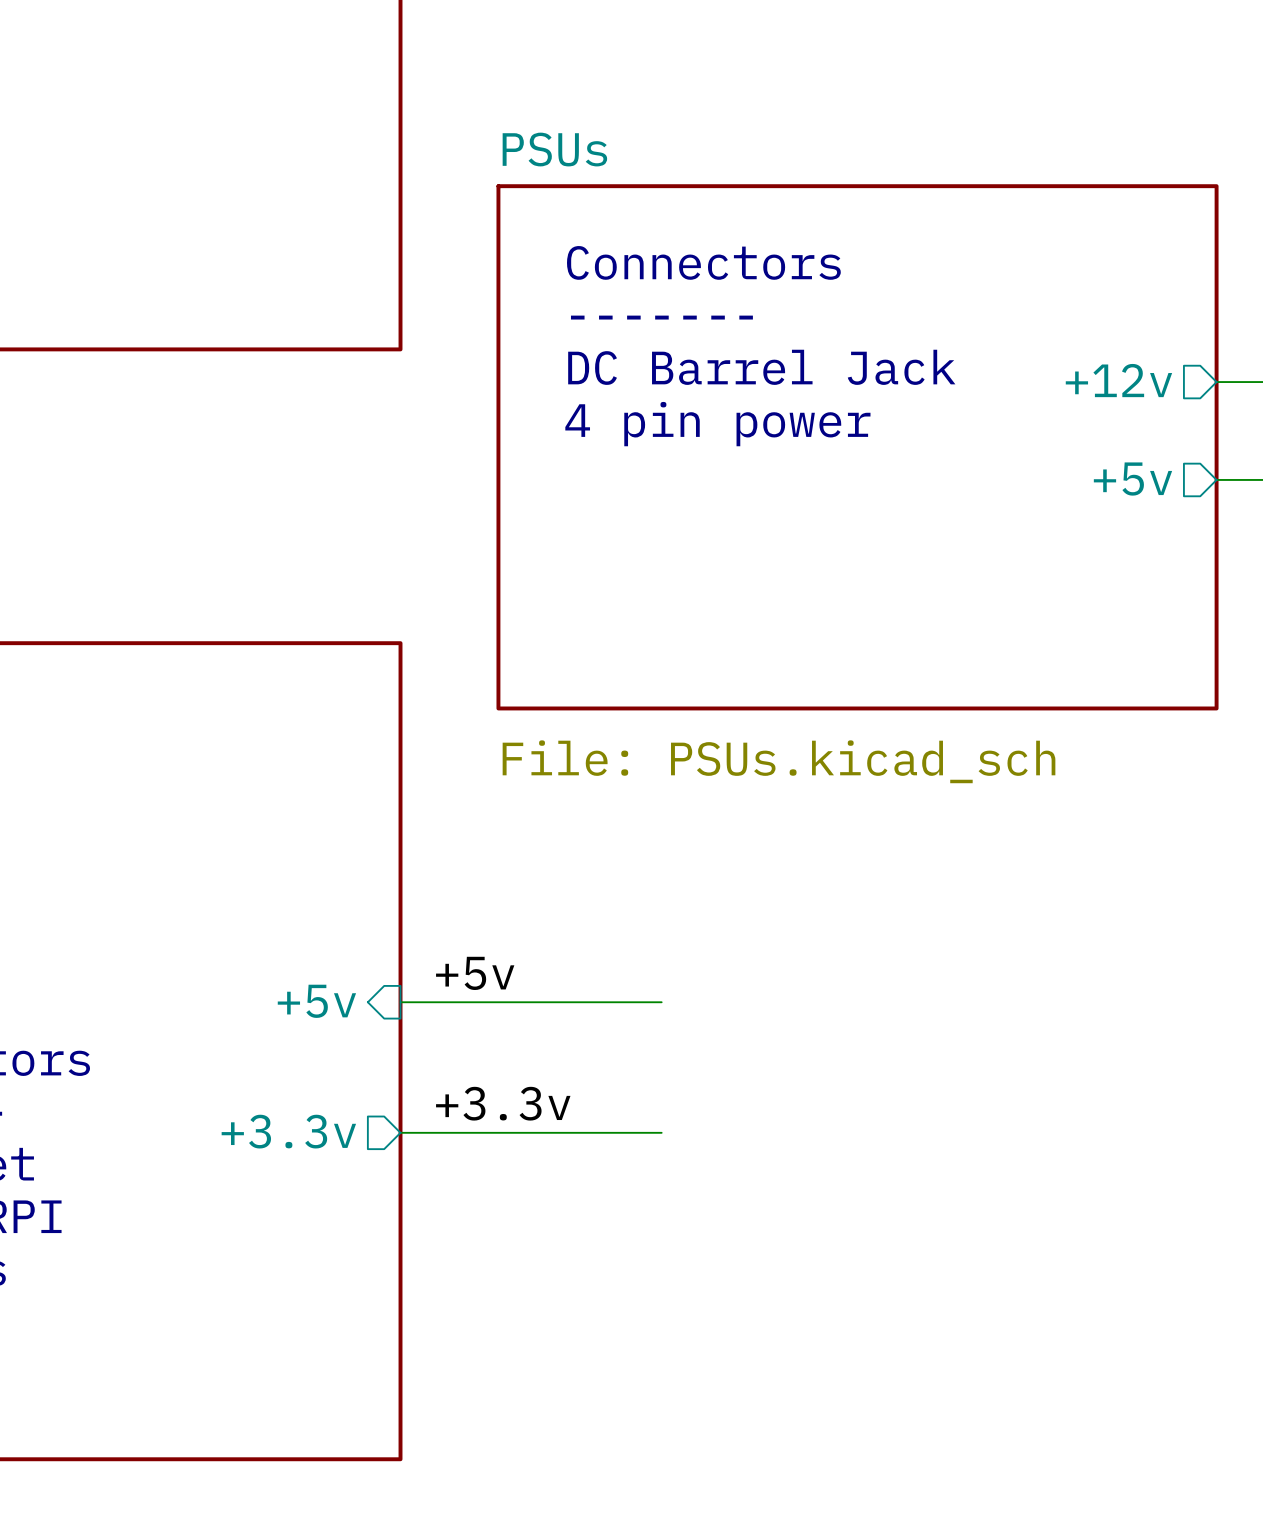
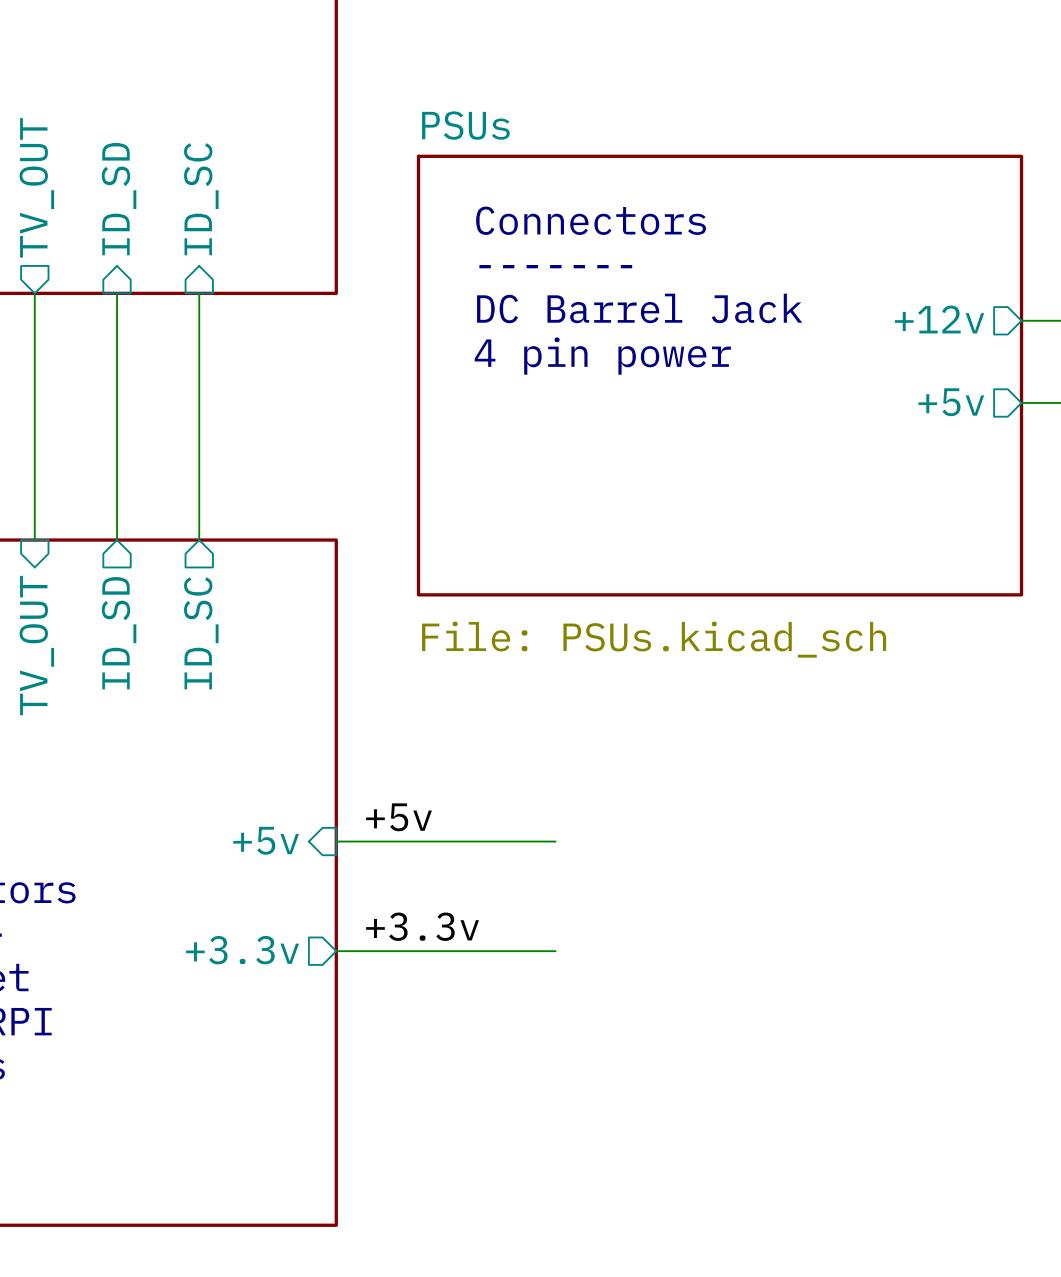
sheet pin: none -> TV_OUT (36, 187)
sheet pin: none -> ID_SD (119, 199)
sheet pin: none -> ID_SC (201, 199)
wire: none -> (34, 293) (34, 540)
wire: none -> (117, 293) (117, 540)
wire: none -> (199, 293) (199, 540)
sheet pin: none -> ID_SD (119, 633)
sheet pin: none -> ID_SC (201, 633)
sheet pin: none -> TV_OUT (36, 645)

